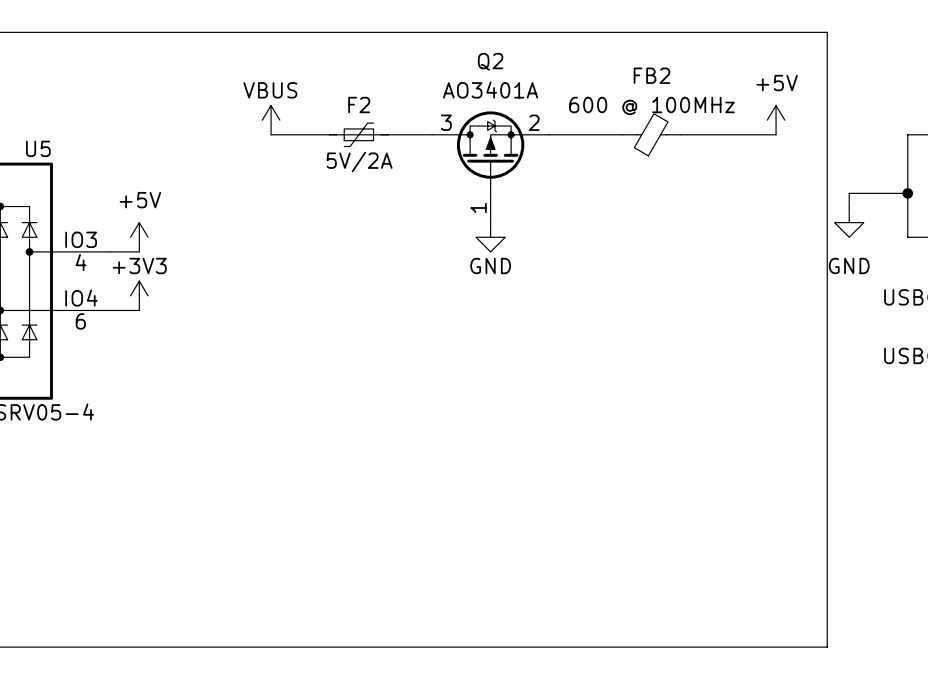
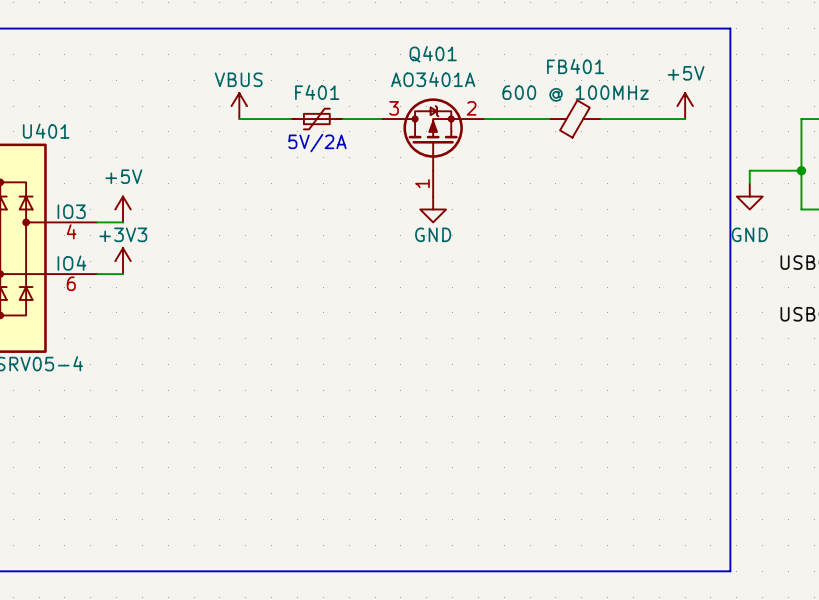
Q2 name: Q2 (490, 61) -> Q401 (433, 54)
FB2 name: FB2 (651, 75) -> FB401 (575, 66)
F2 name: F2 (359, 104) -> F401 (317, 92)
U5 name: U5 (38, 148) -> U401 (46, 131)

